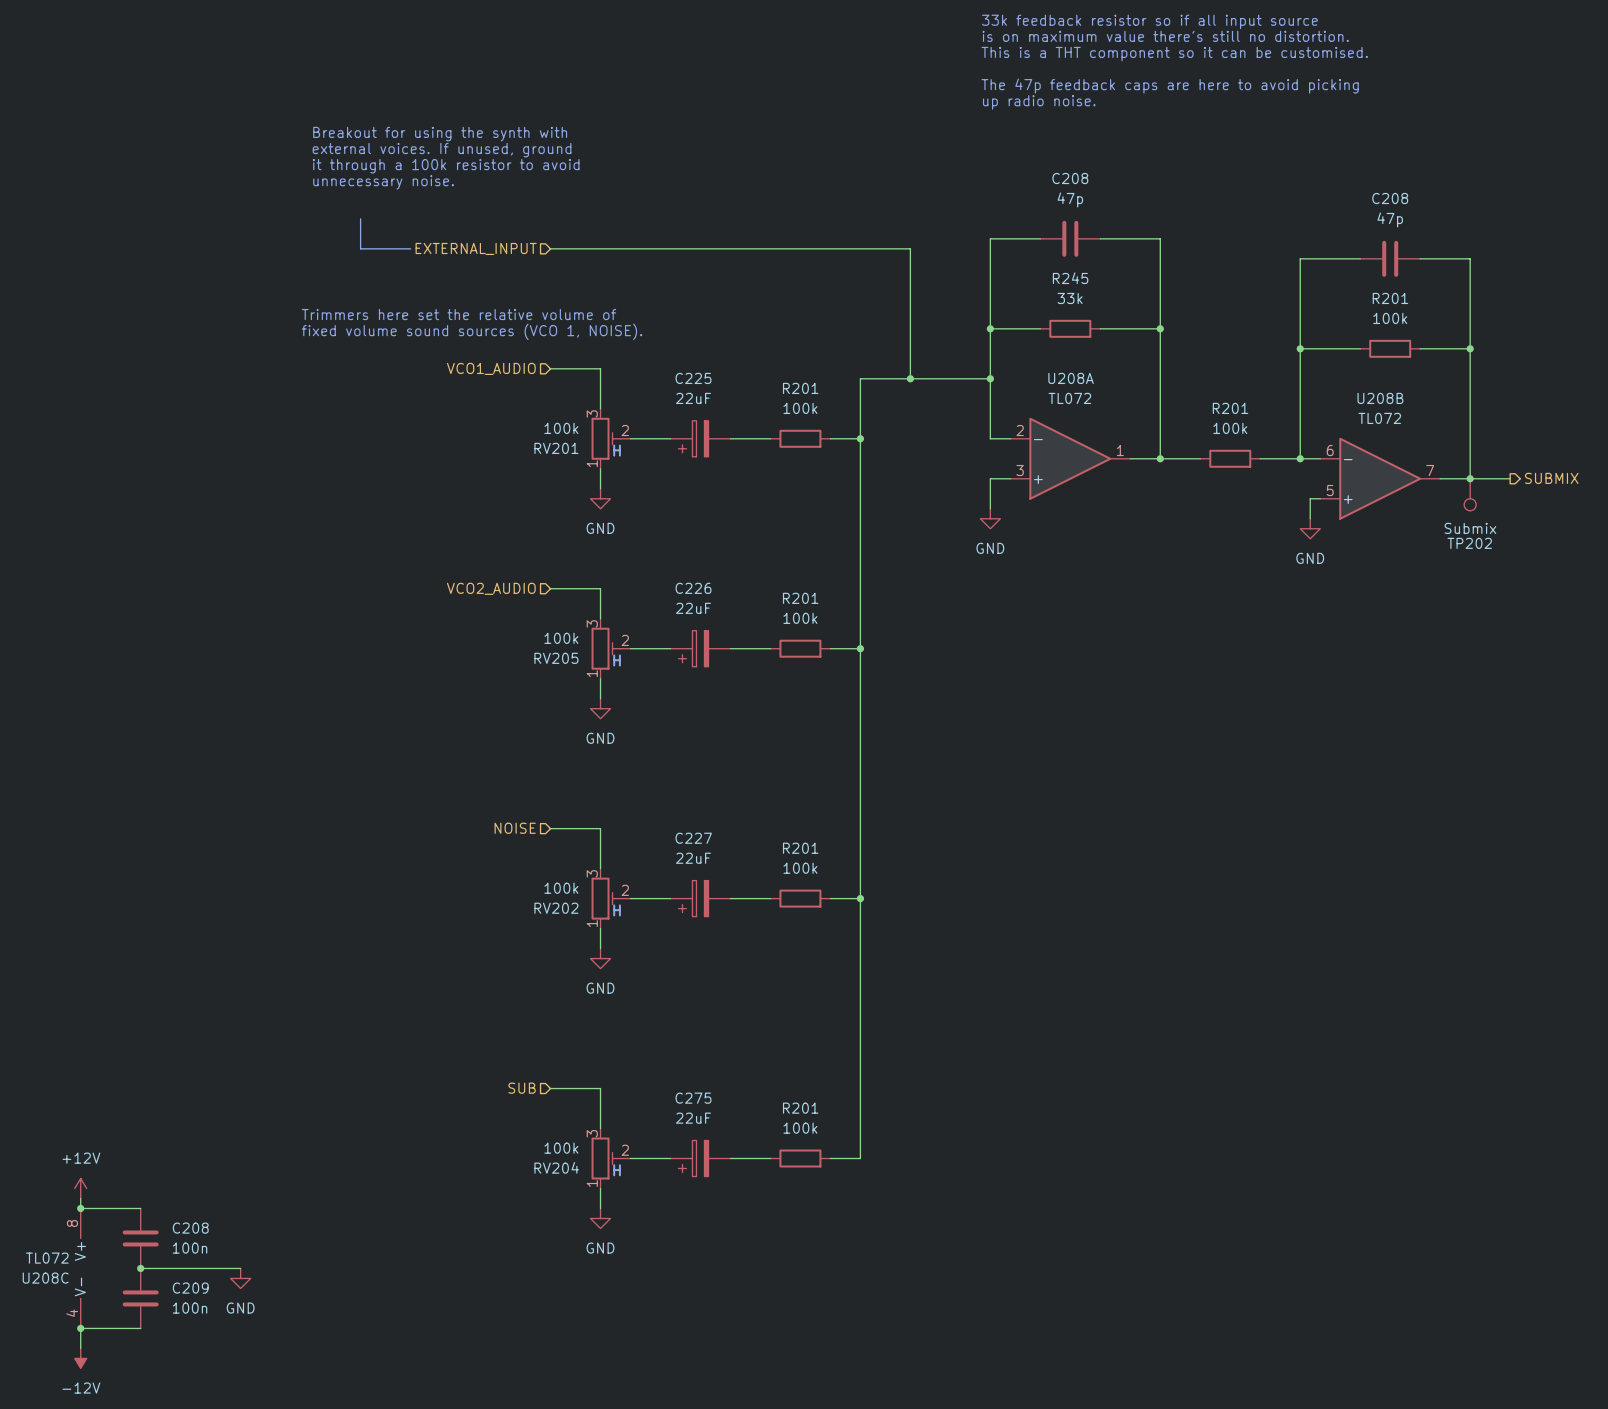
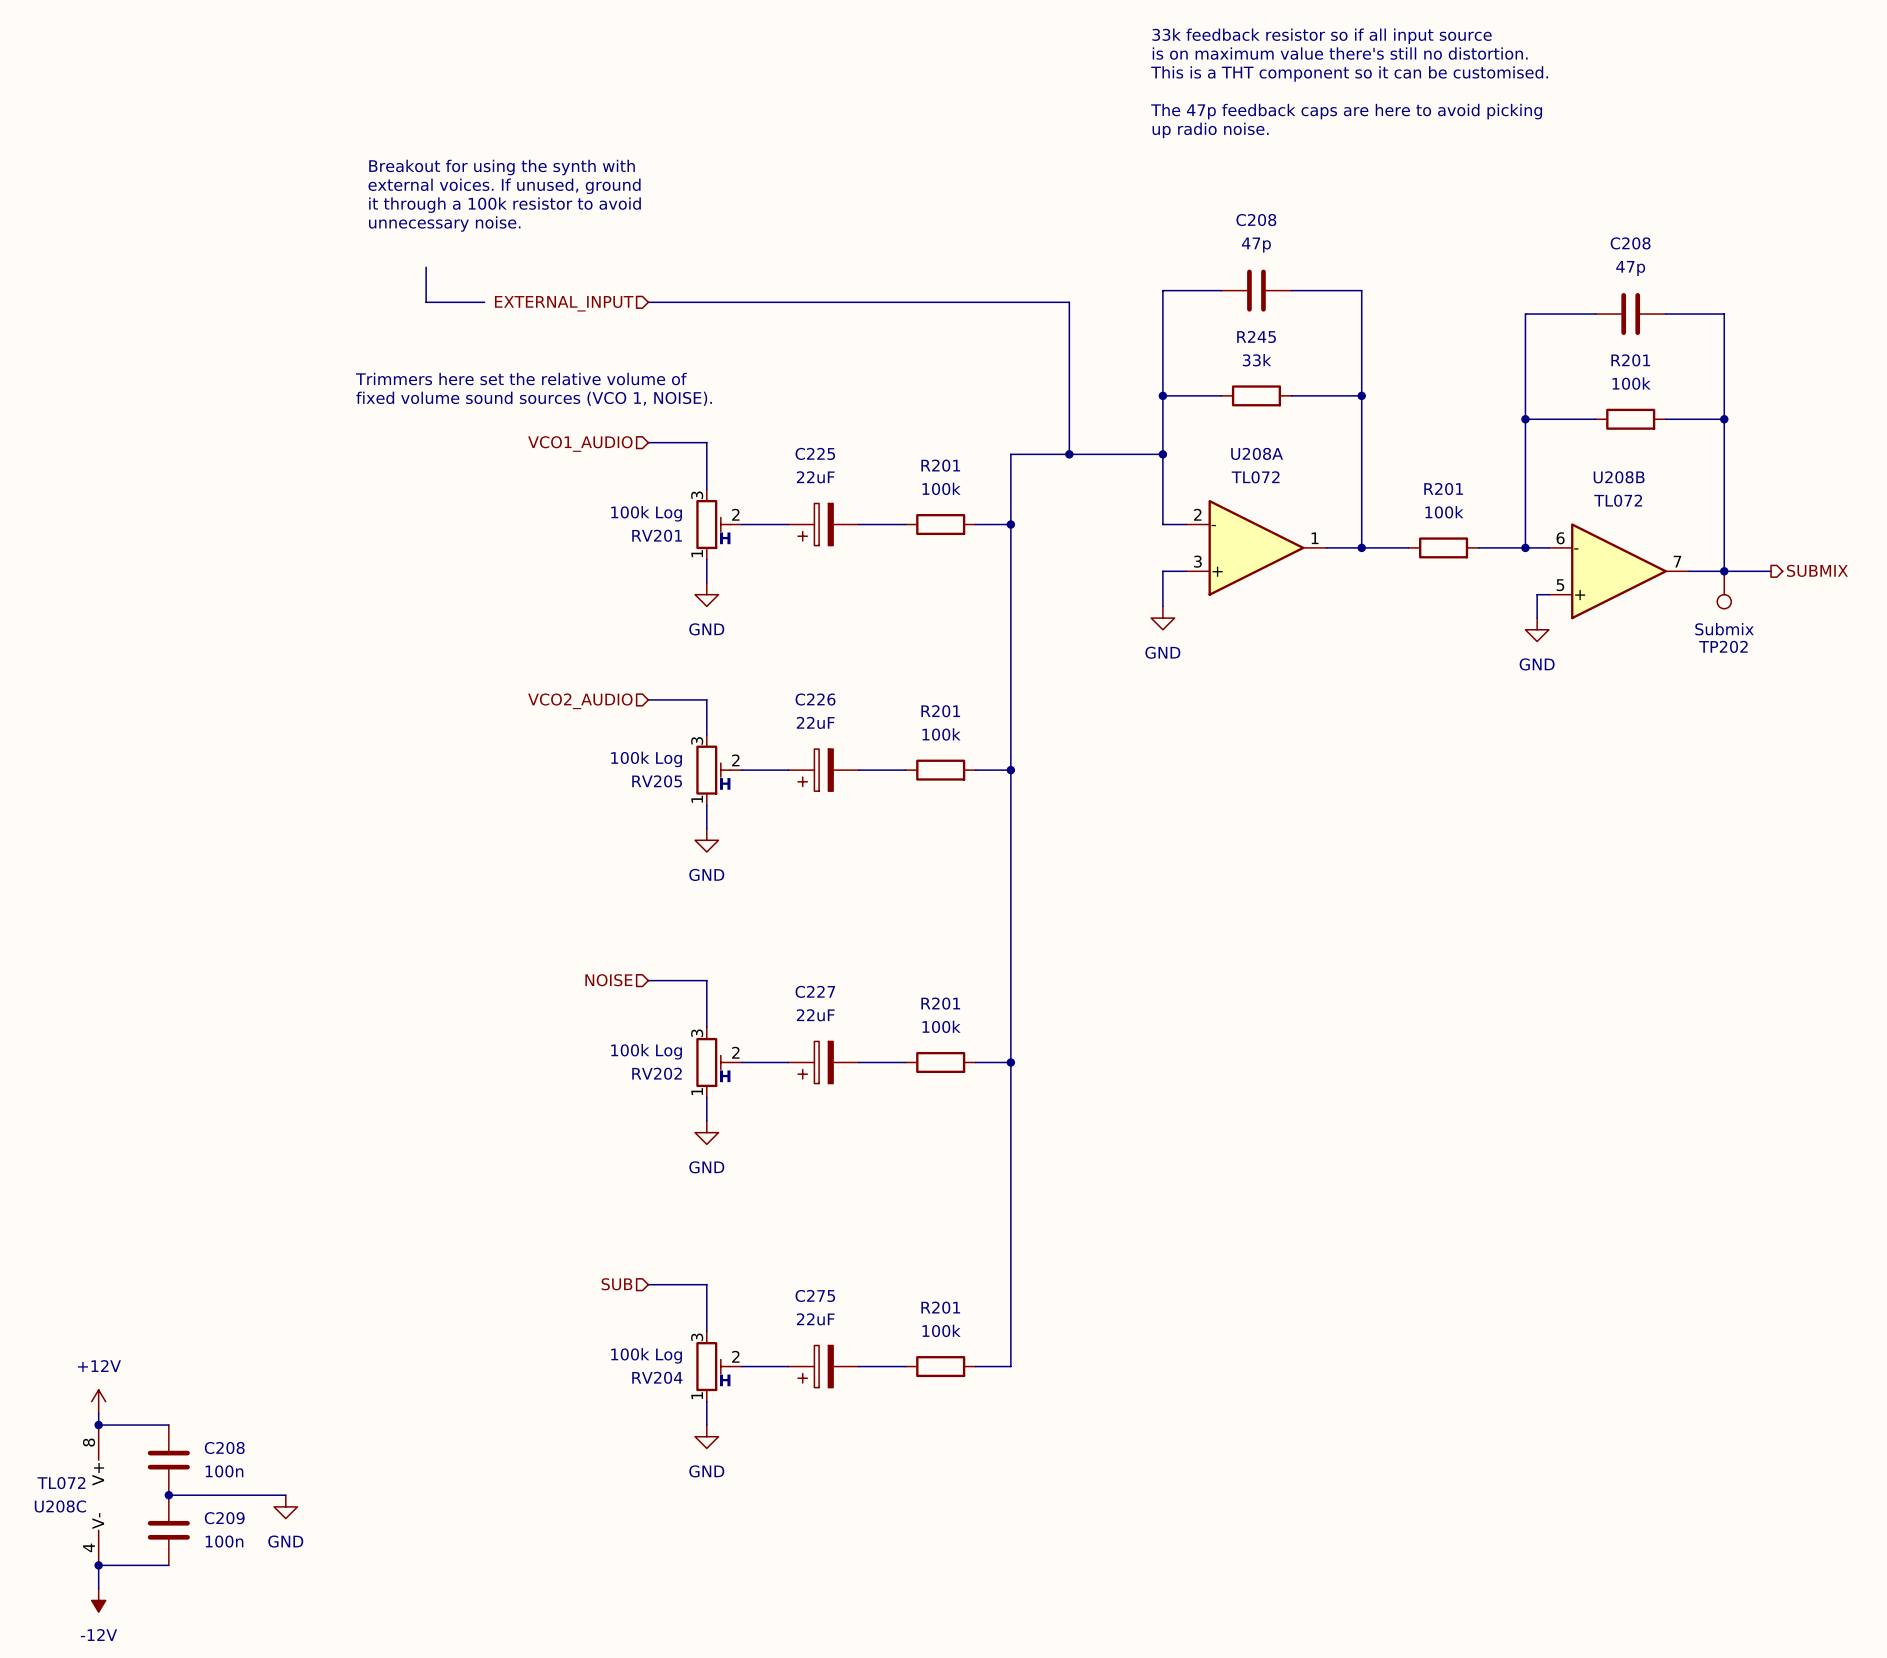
RV201 value: 100k (561, 428) -> 100k Log (646, 513)
RV205 value: 100k (561, 638) -> 100k Log (646, 759)
RV202 value: 100k (561, 888) -> 100k Log (646, 1051)
RV204 value: 100k (561, 1148) -> 100k Log (646, 1355)

